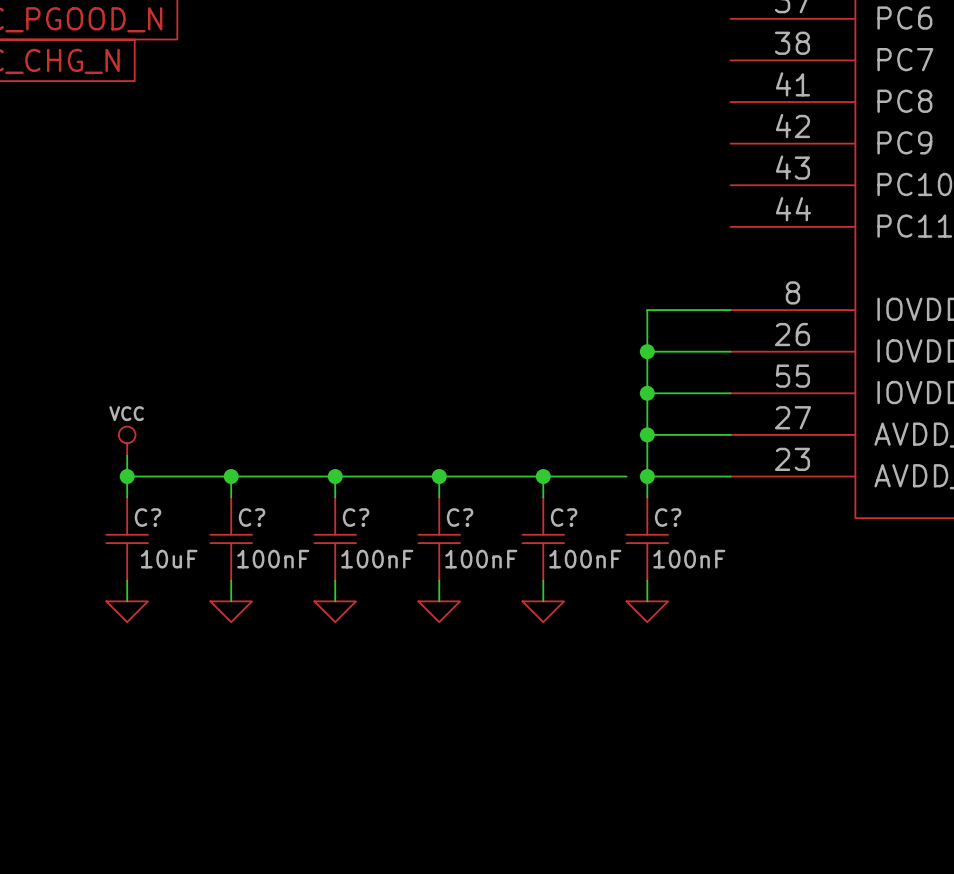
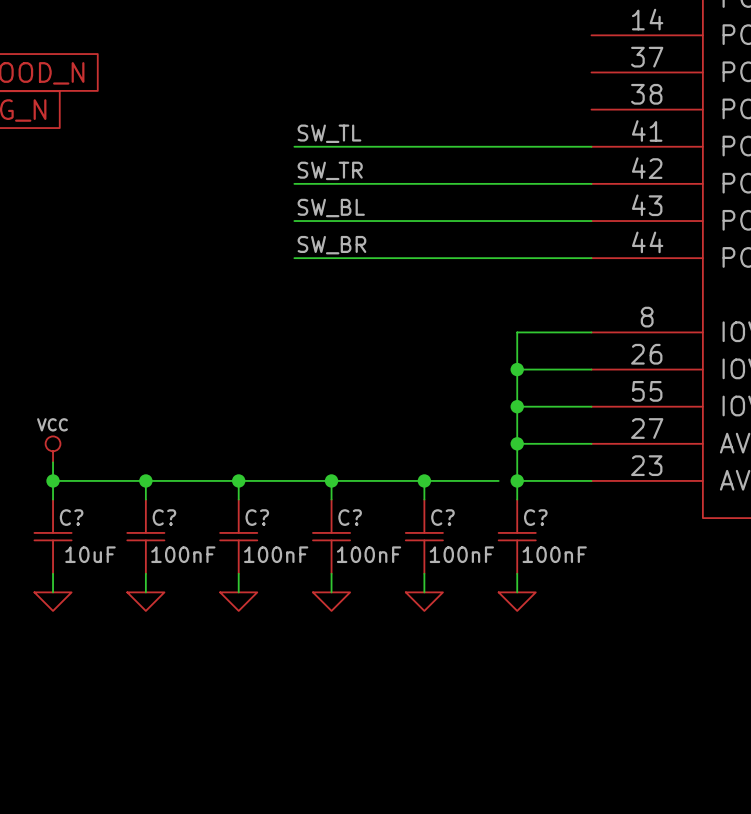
label: none -> SW_TL (329, 133)
wire: none -> (294, 146) (591, 146)
label: none -> SW_TR (330, 170)
wire: none -> (294, 183) (591, 183)
label: none -> SW_BL (331, 208)
wire: none -> (294, 221) (591, 221)
label: none -> SW_BR (331, 245)
wire: none -> (294, 258) (591, 258)

